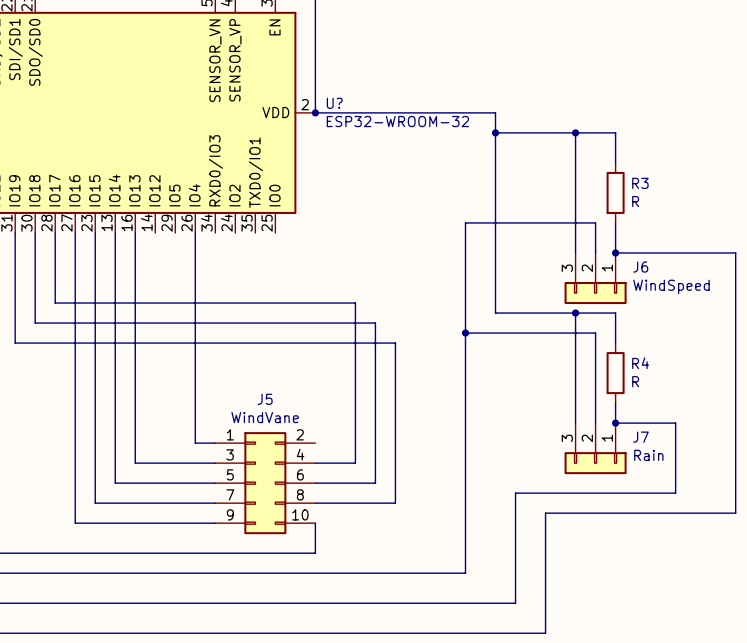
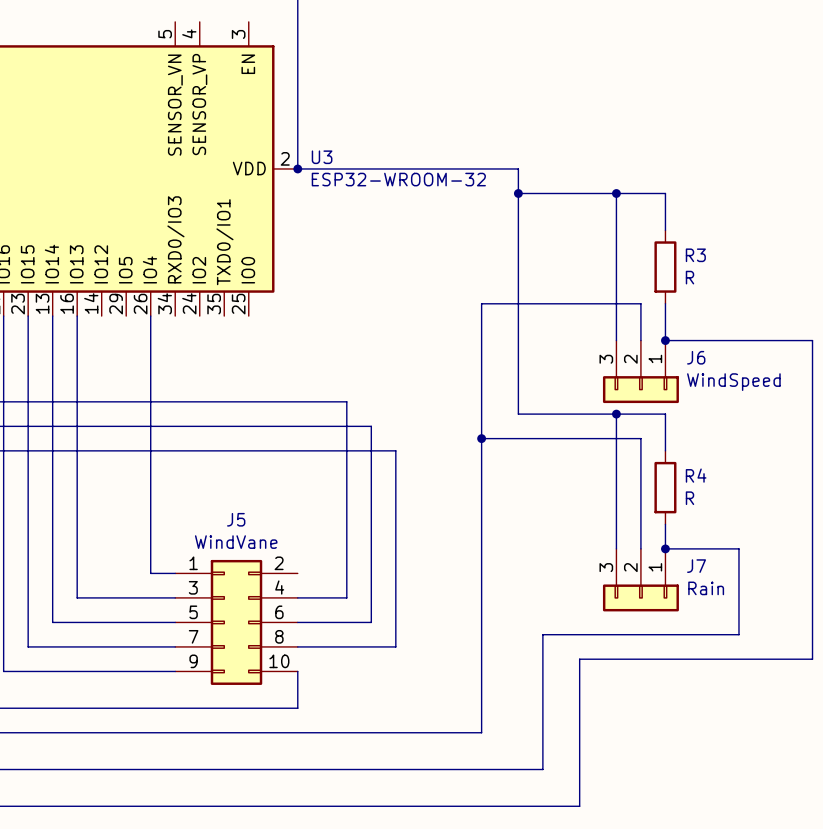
U? name: U? (334, 103) -> U3 (322, 157)

